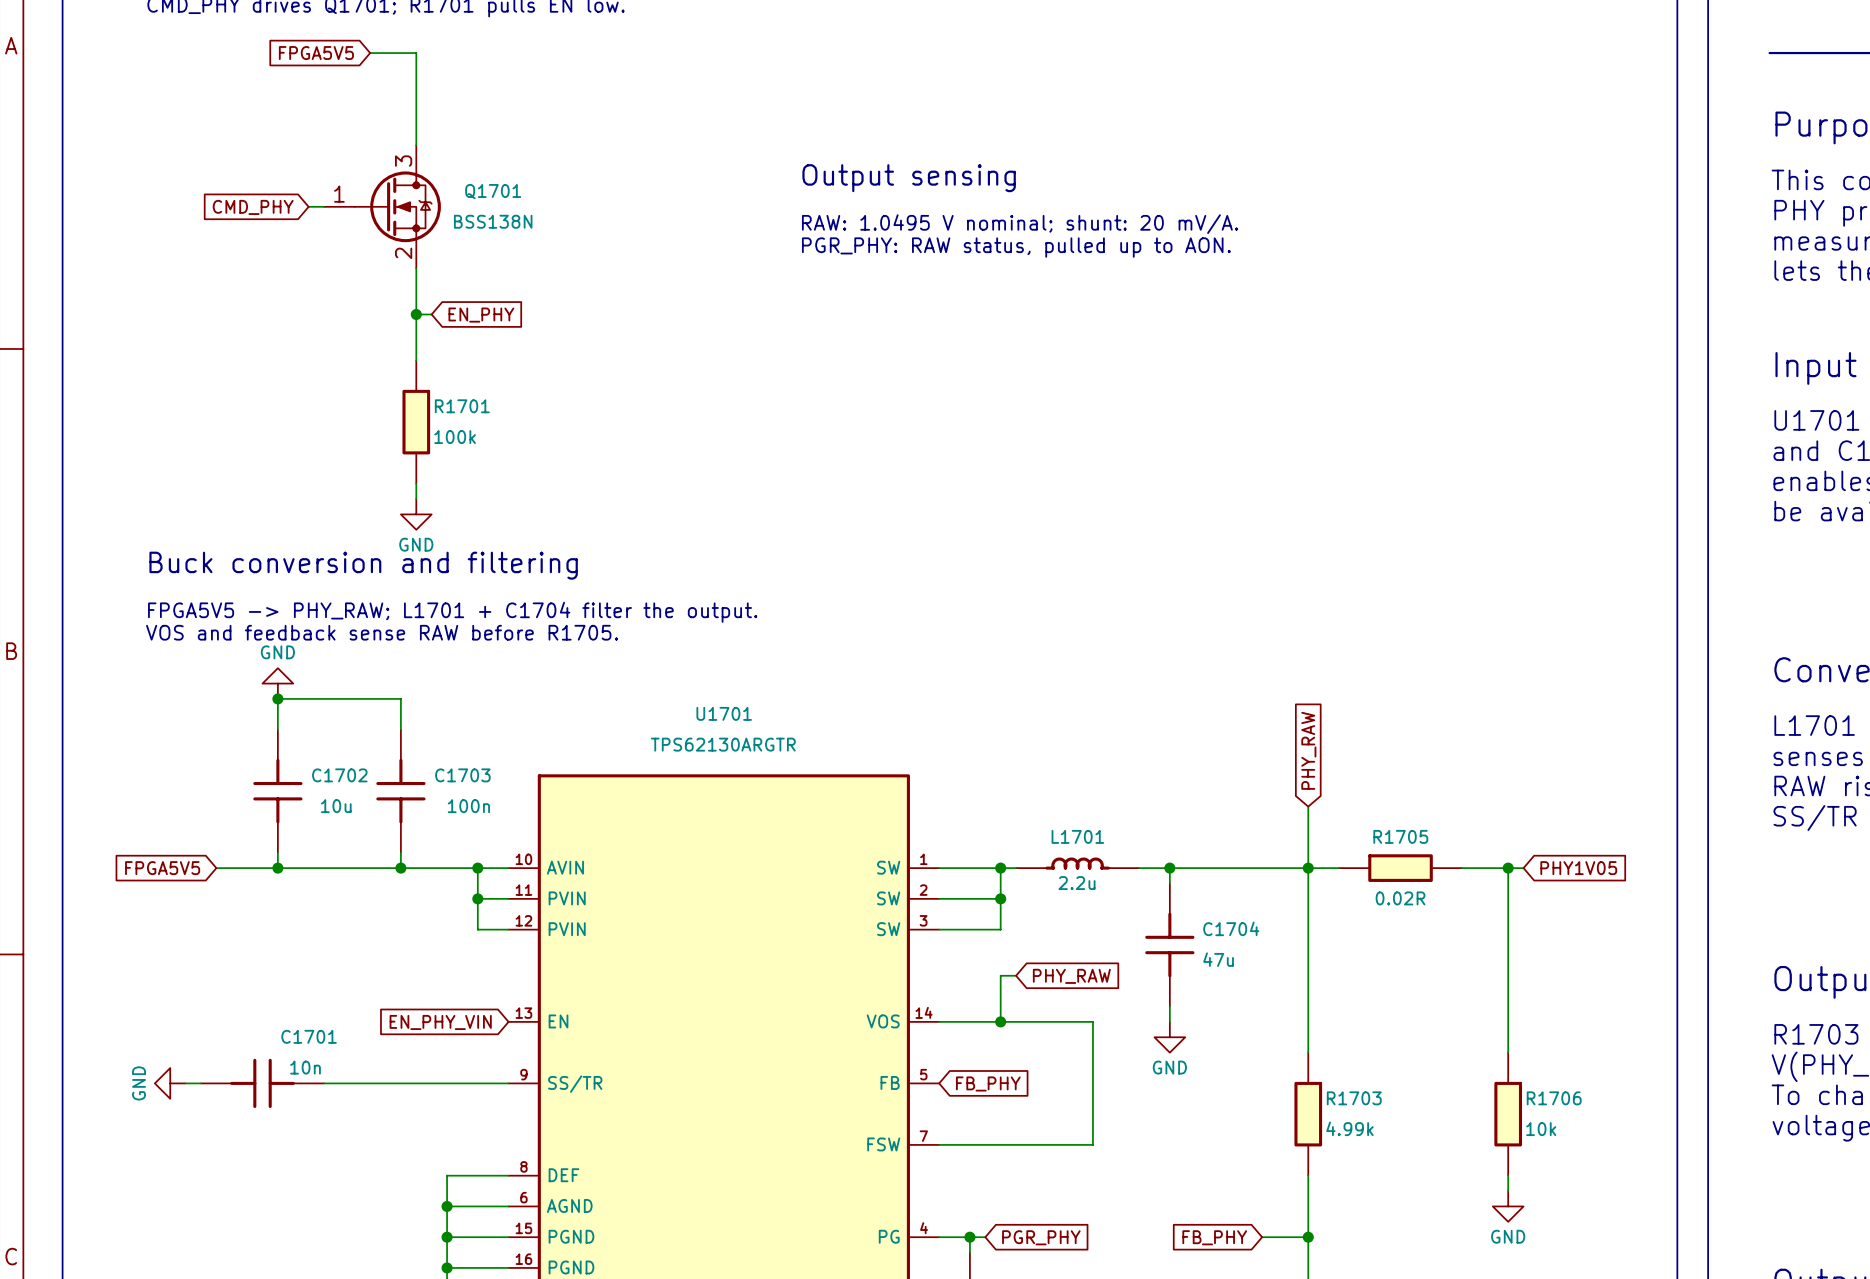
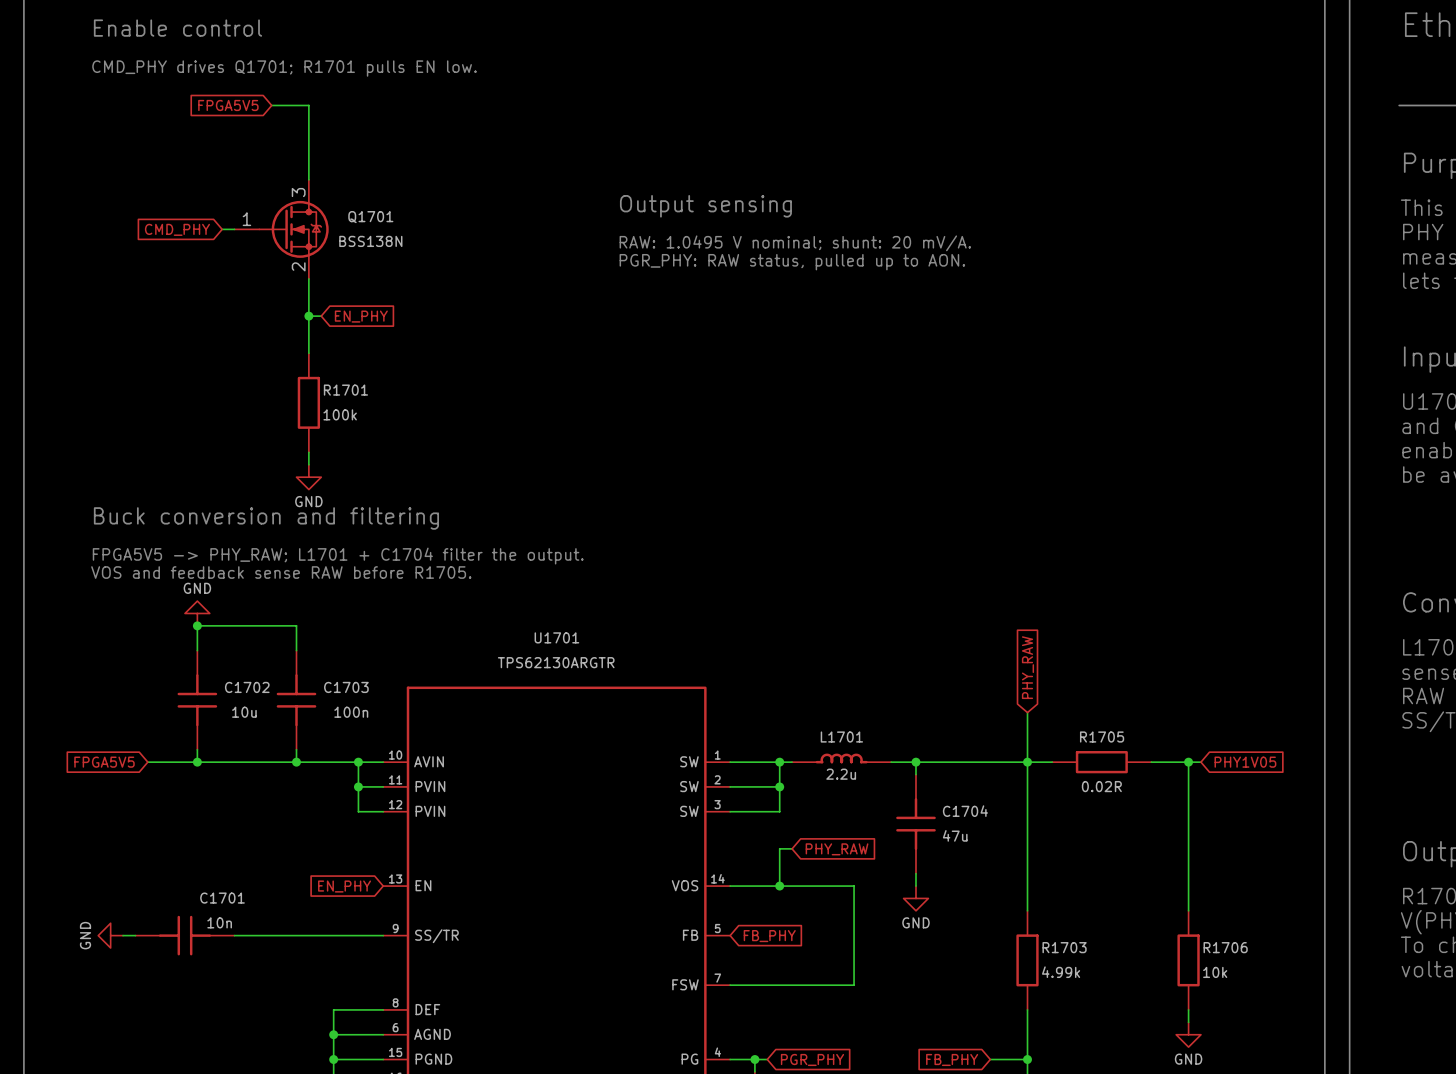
global label: EN_PHY_VIN (440, 1022) -> EN_PHY (344, 886)

